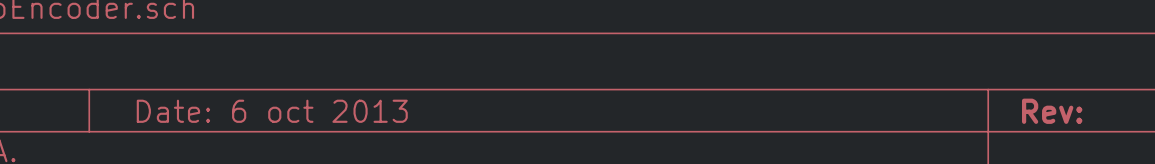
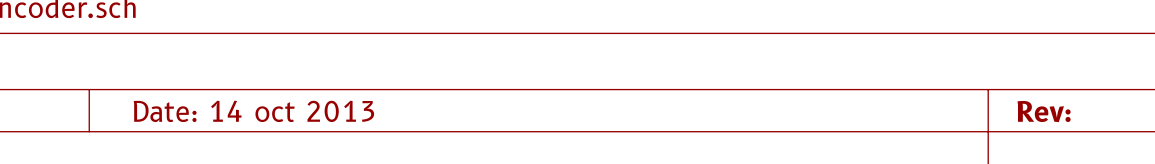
title block: Date: 6 oct 2013 (272, 111) -> Date: 14 oct 2013 (253, 111)

